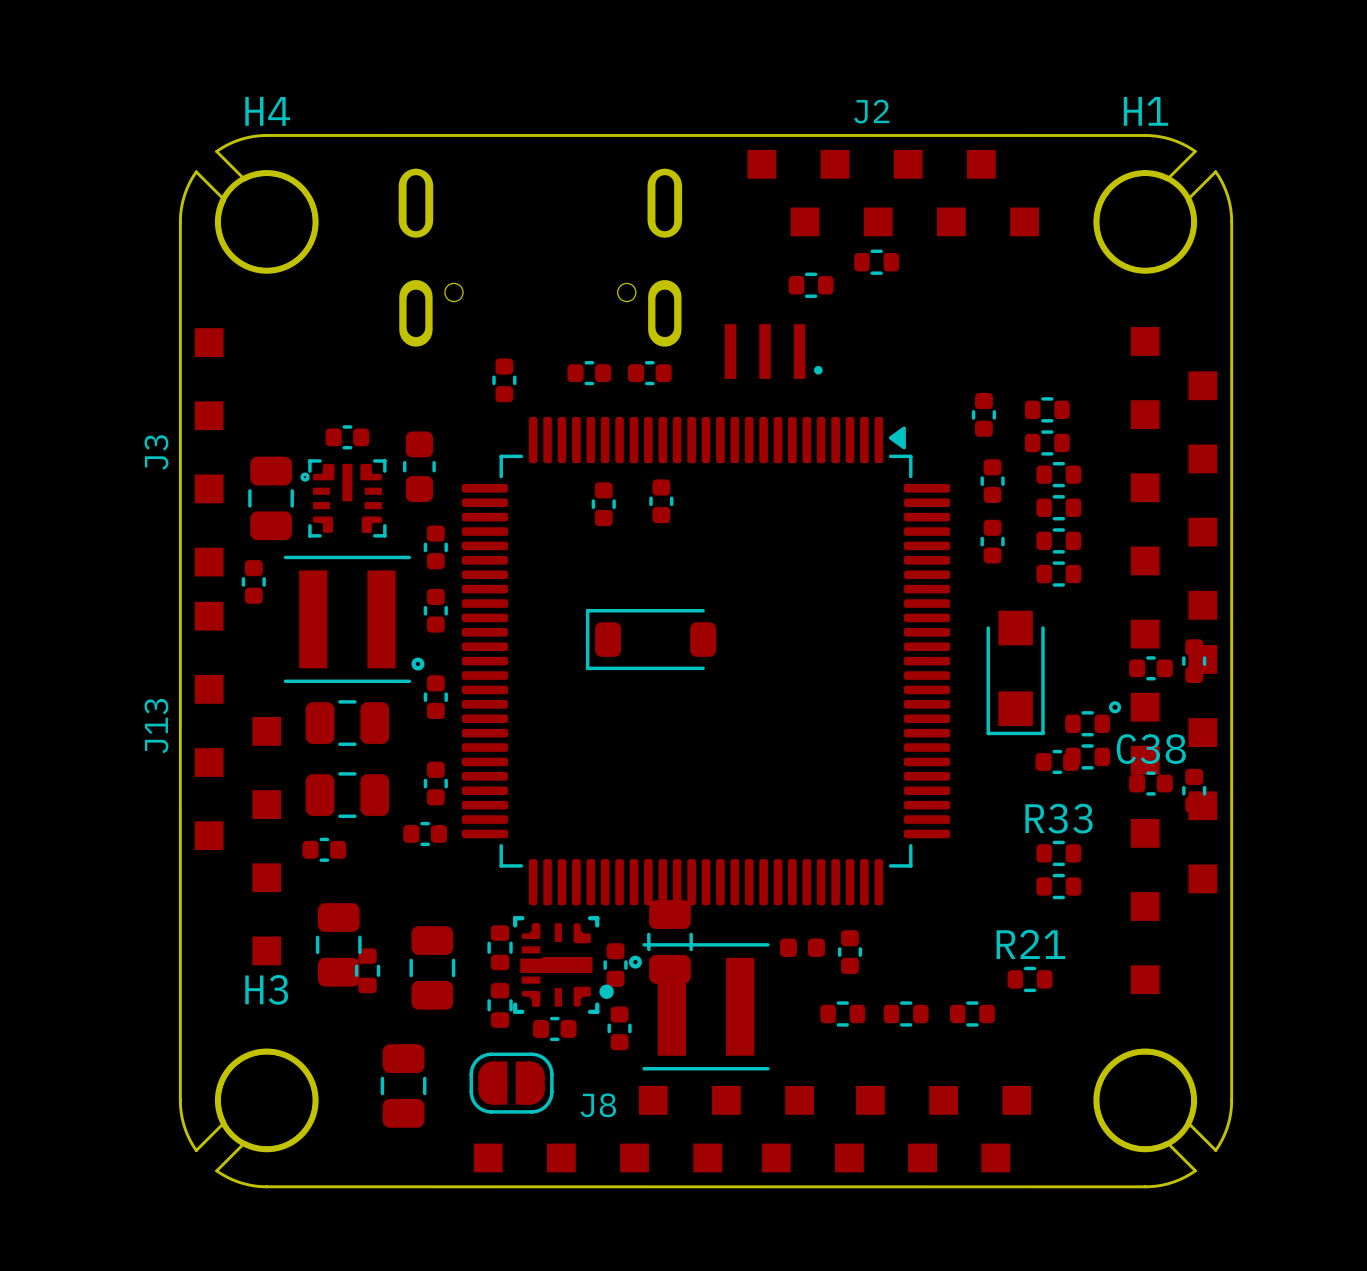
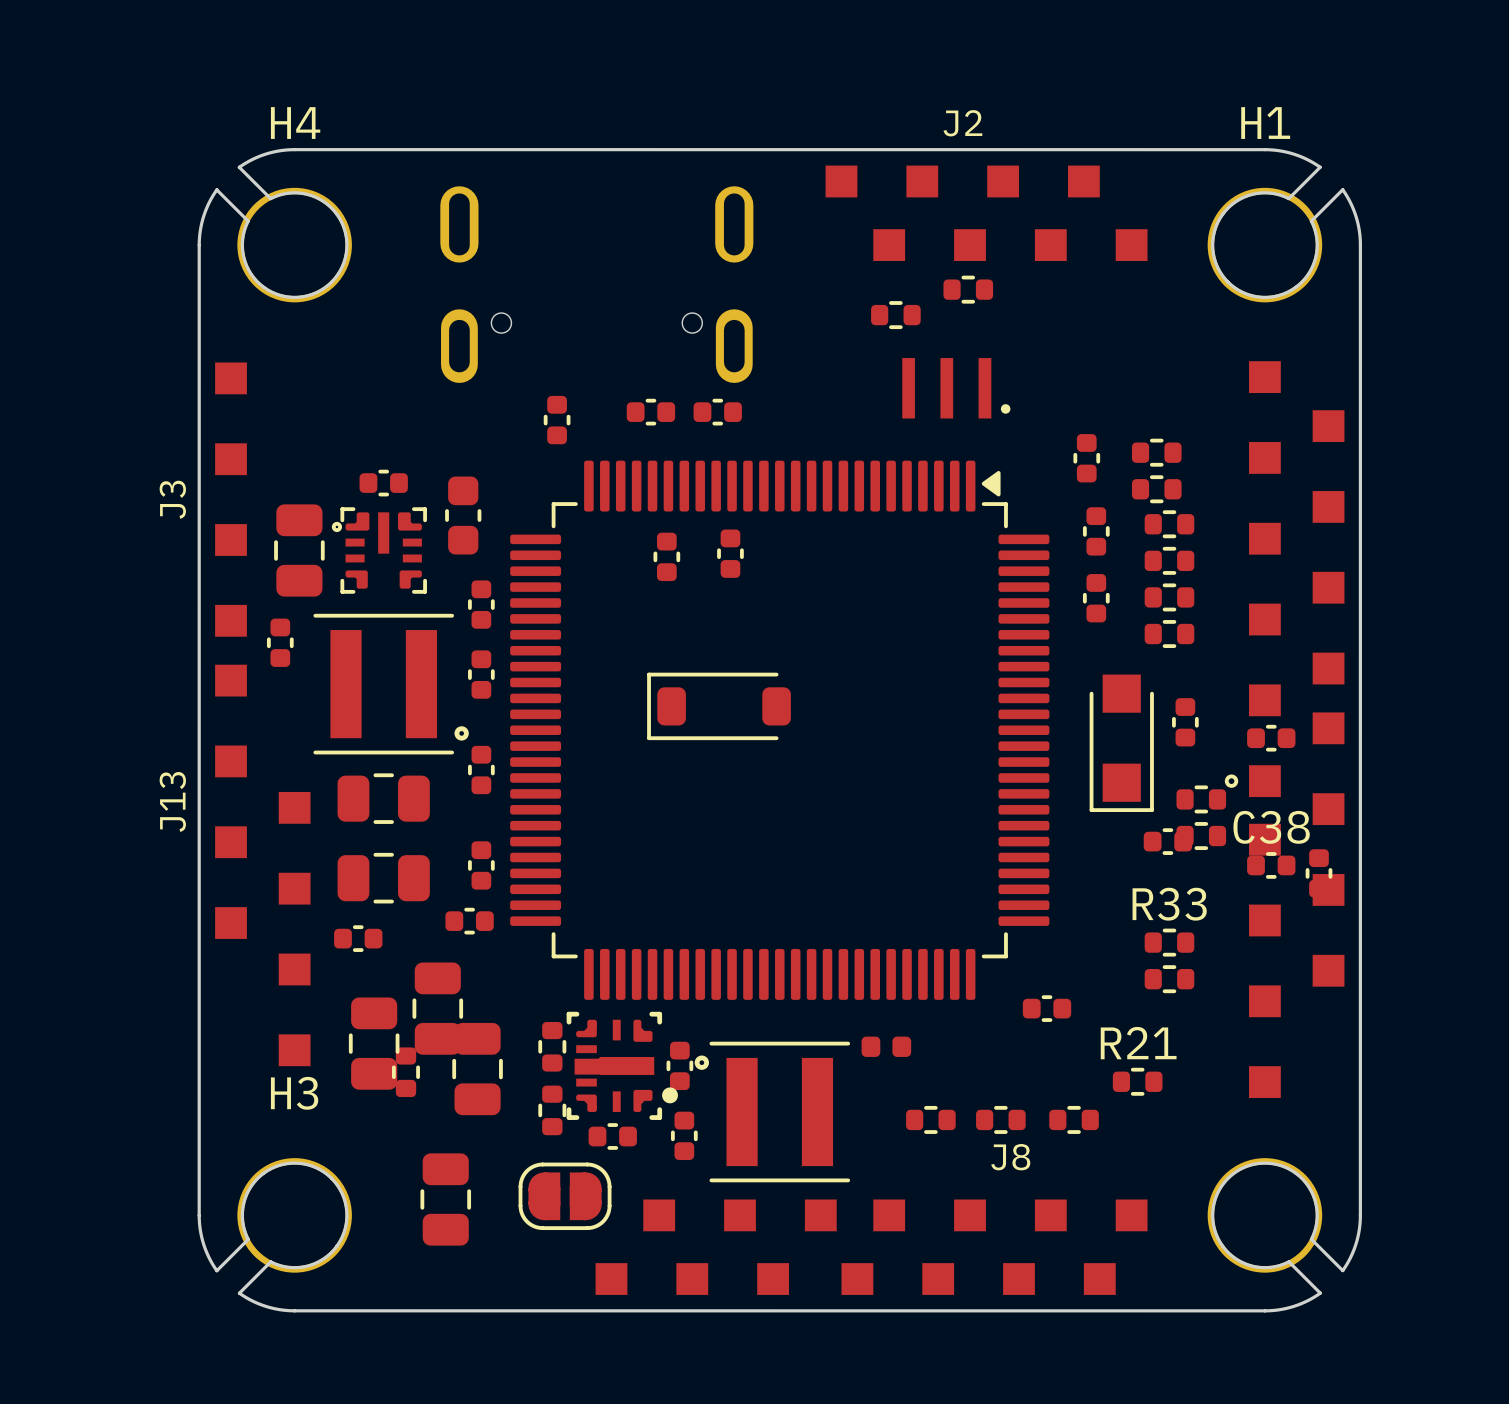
part position: (773, 351) -> (956, 388)
part position: (1194, 661) -> (1185, 722)
part position: (669, 941) -> (437, 1008)
part rotation: 0° (850, 952) -> 90° clockwise (1047, 1008)
part position: (850, 952) -> (1047, 1008)
part position: (726, 1100) -> (740, 1215)
part: (943, 1100) -> none
J8 position: (597, 1157) -> (1010, 1215)
part: none -> (692, 1279)

